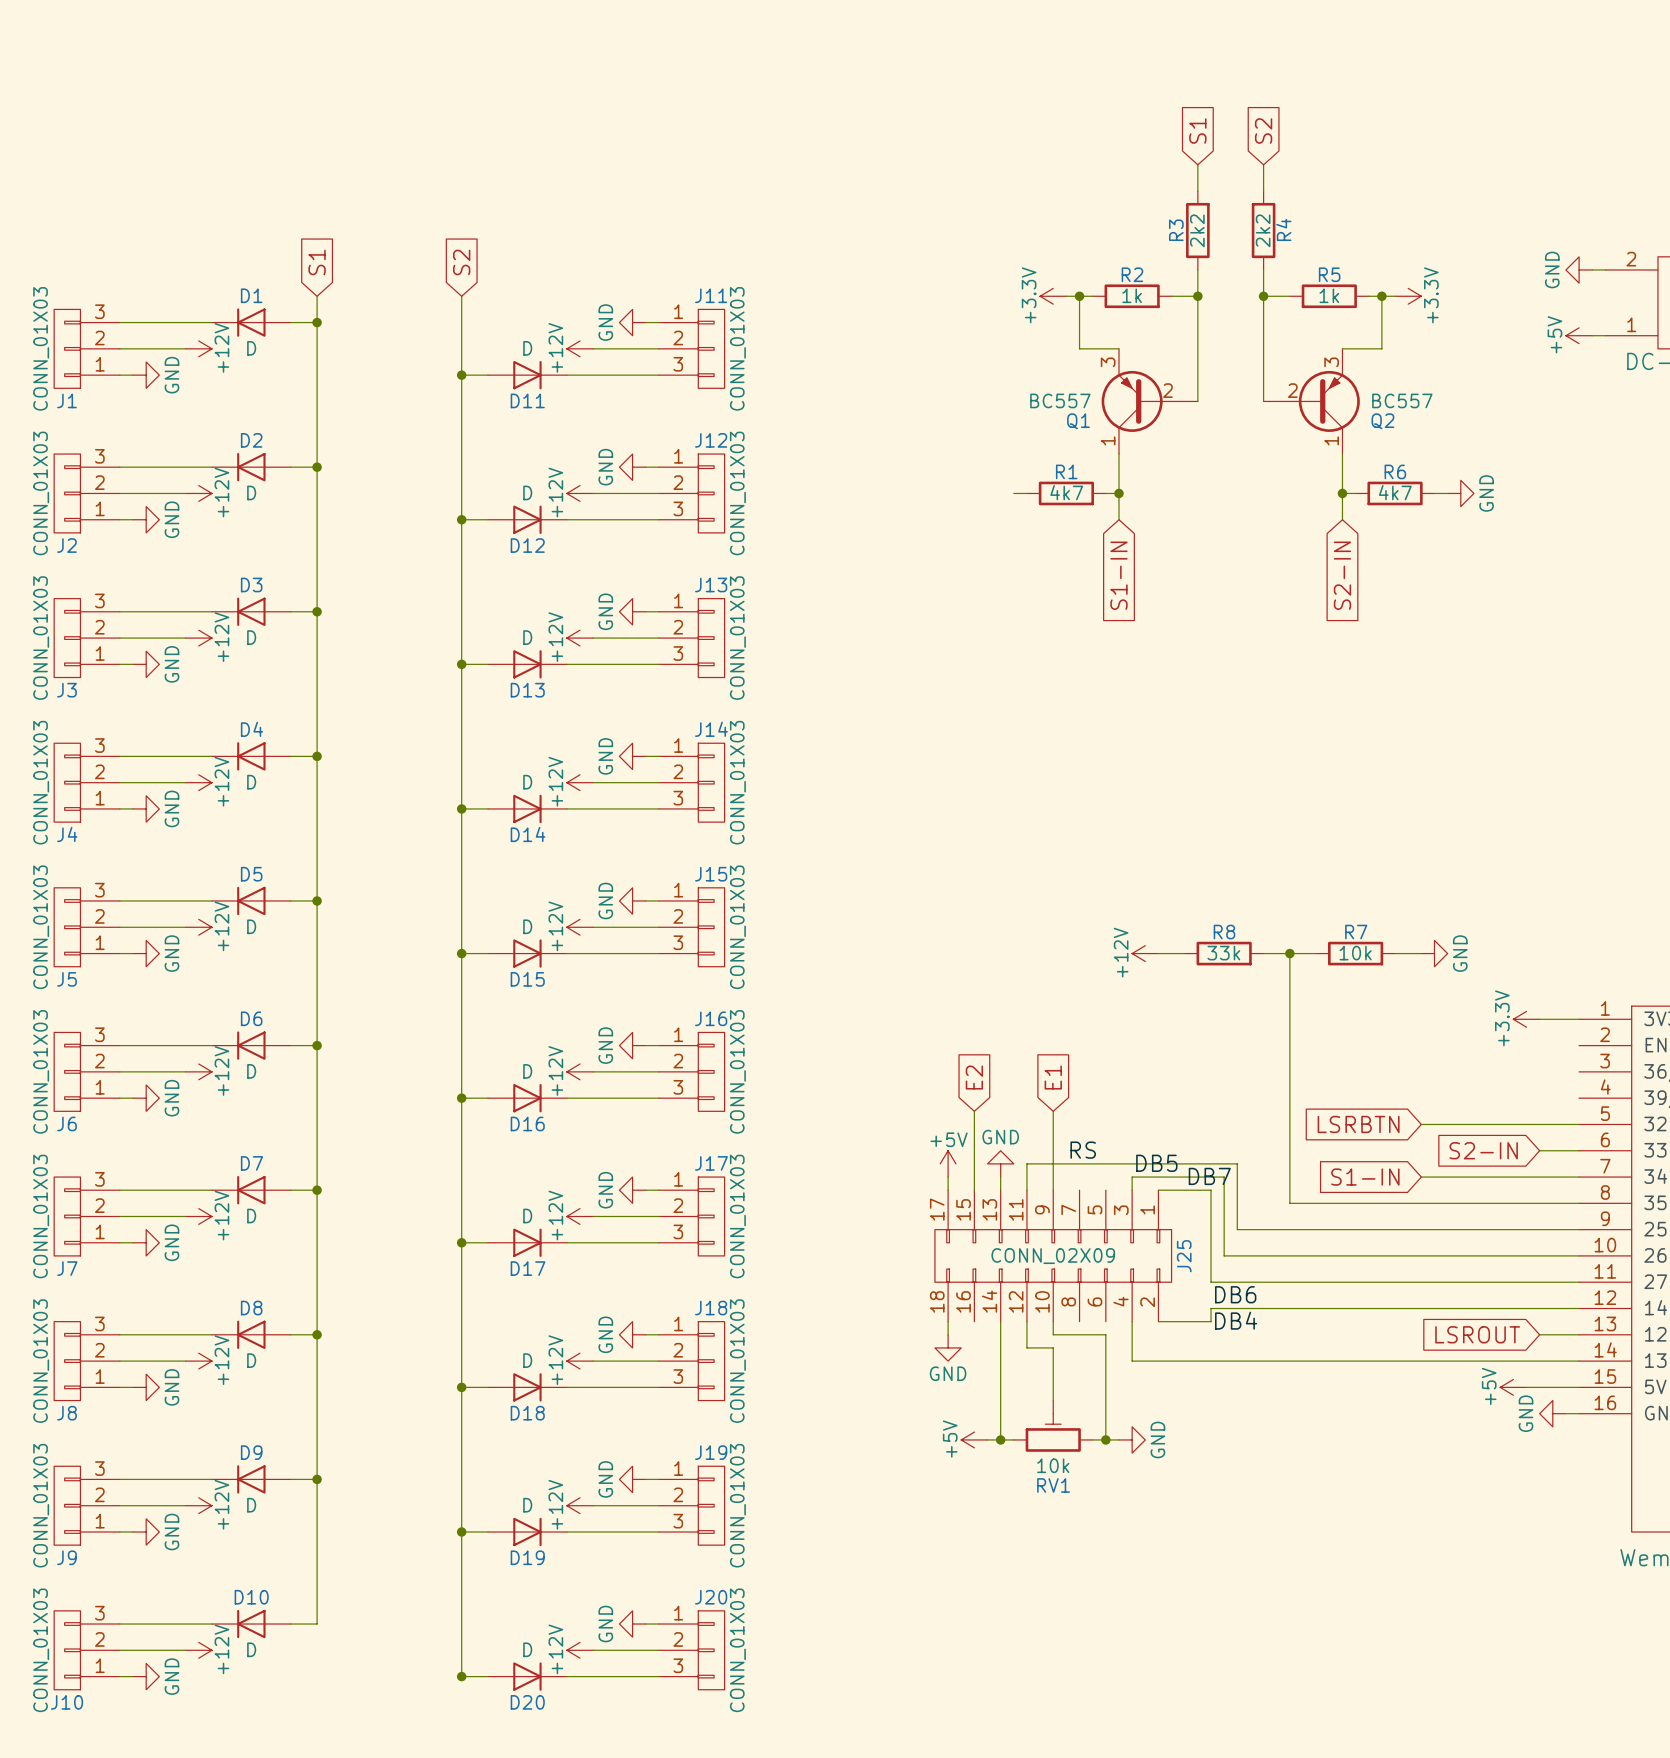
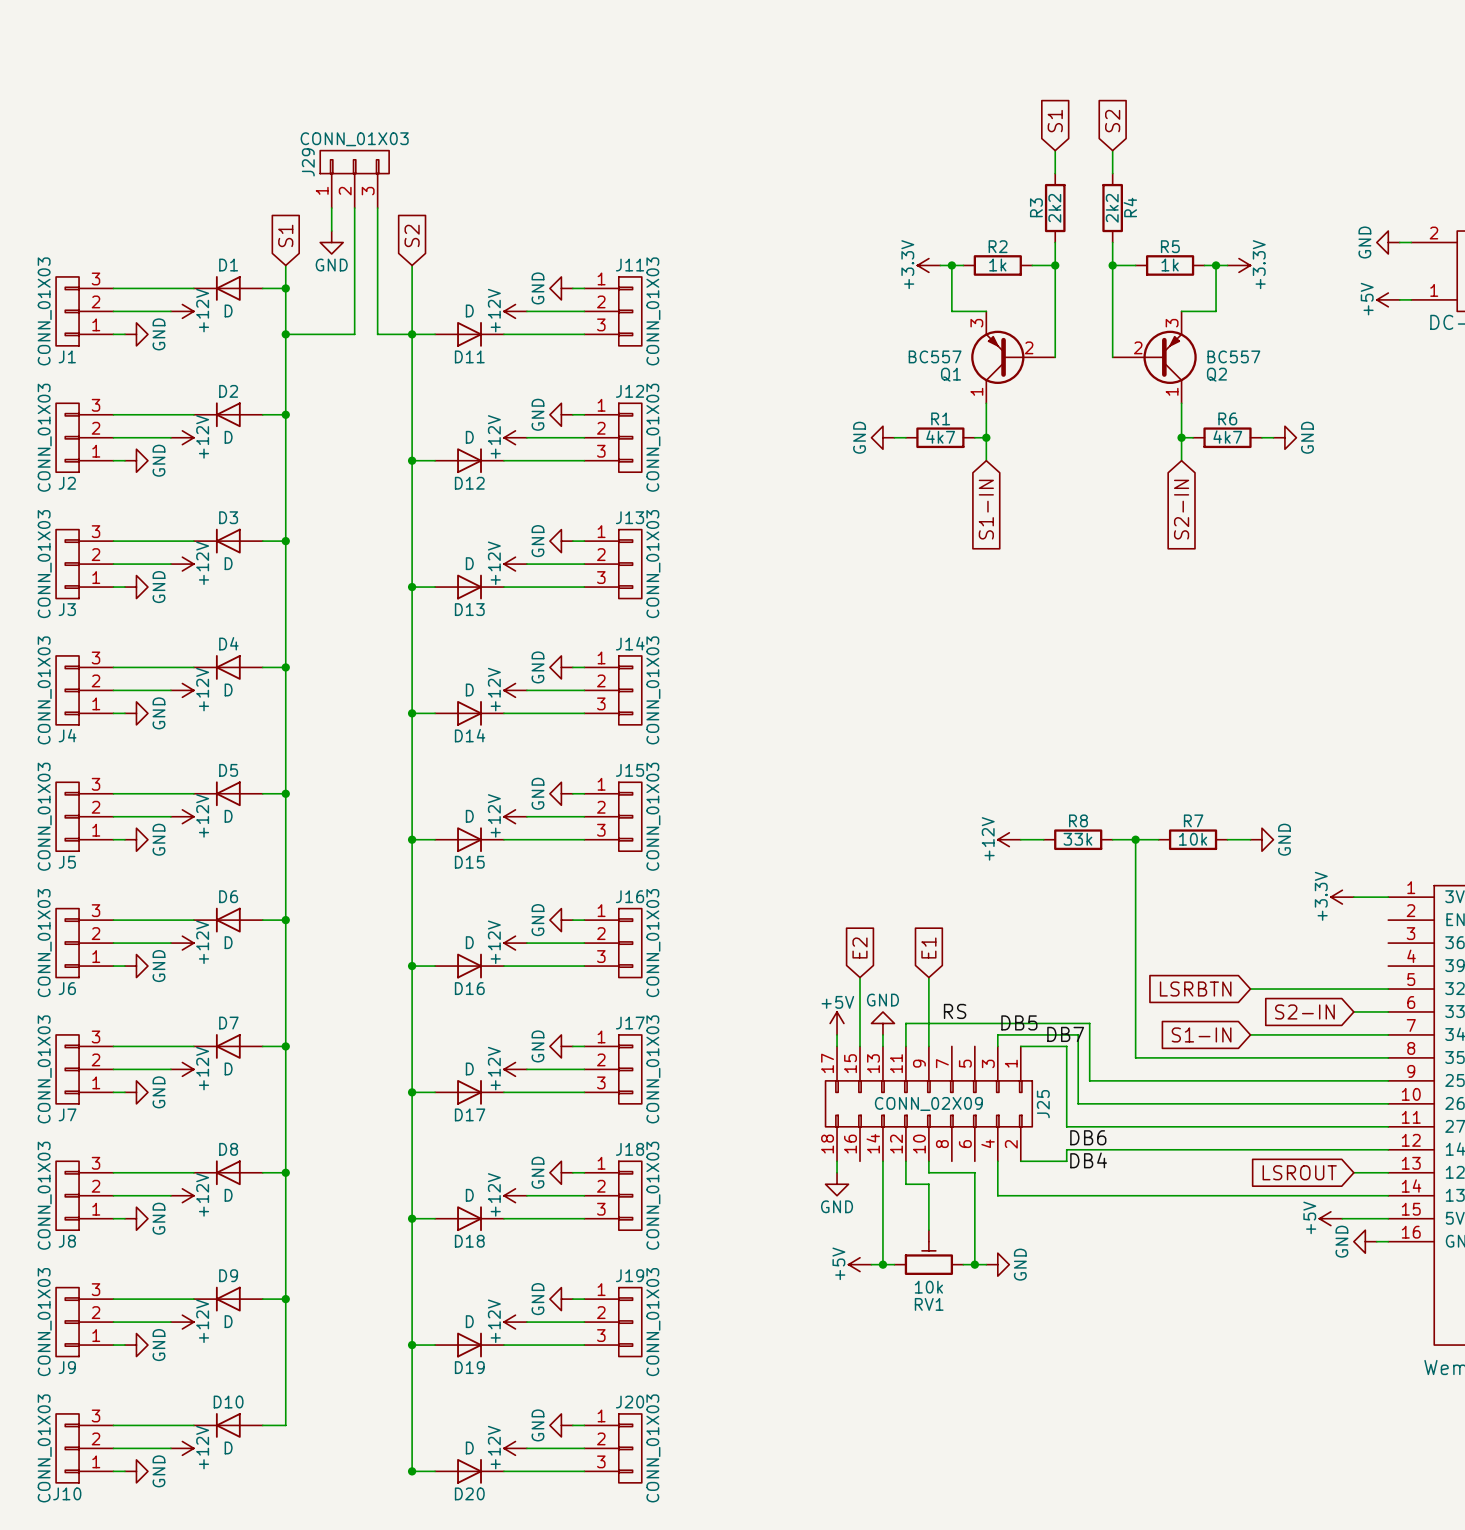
J29: none -> CONN_01X03 (354, 179)
wire: none -> (331, 208) (331, 231)
wire: none -> (354, 208) (354, 334) (285, 334)
wire: none -> (377, 208) (377, 334) (412, 334)
power symbol: none -> GND (331, 242)
junction: none -> (285, 334)
power symbol: none -> GND (882, 437)

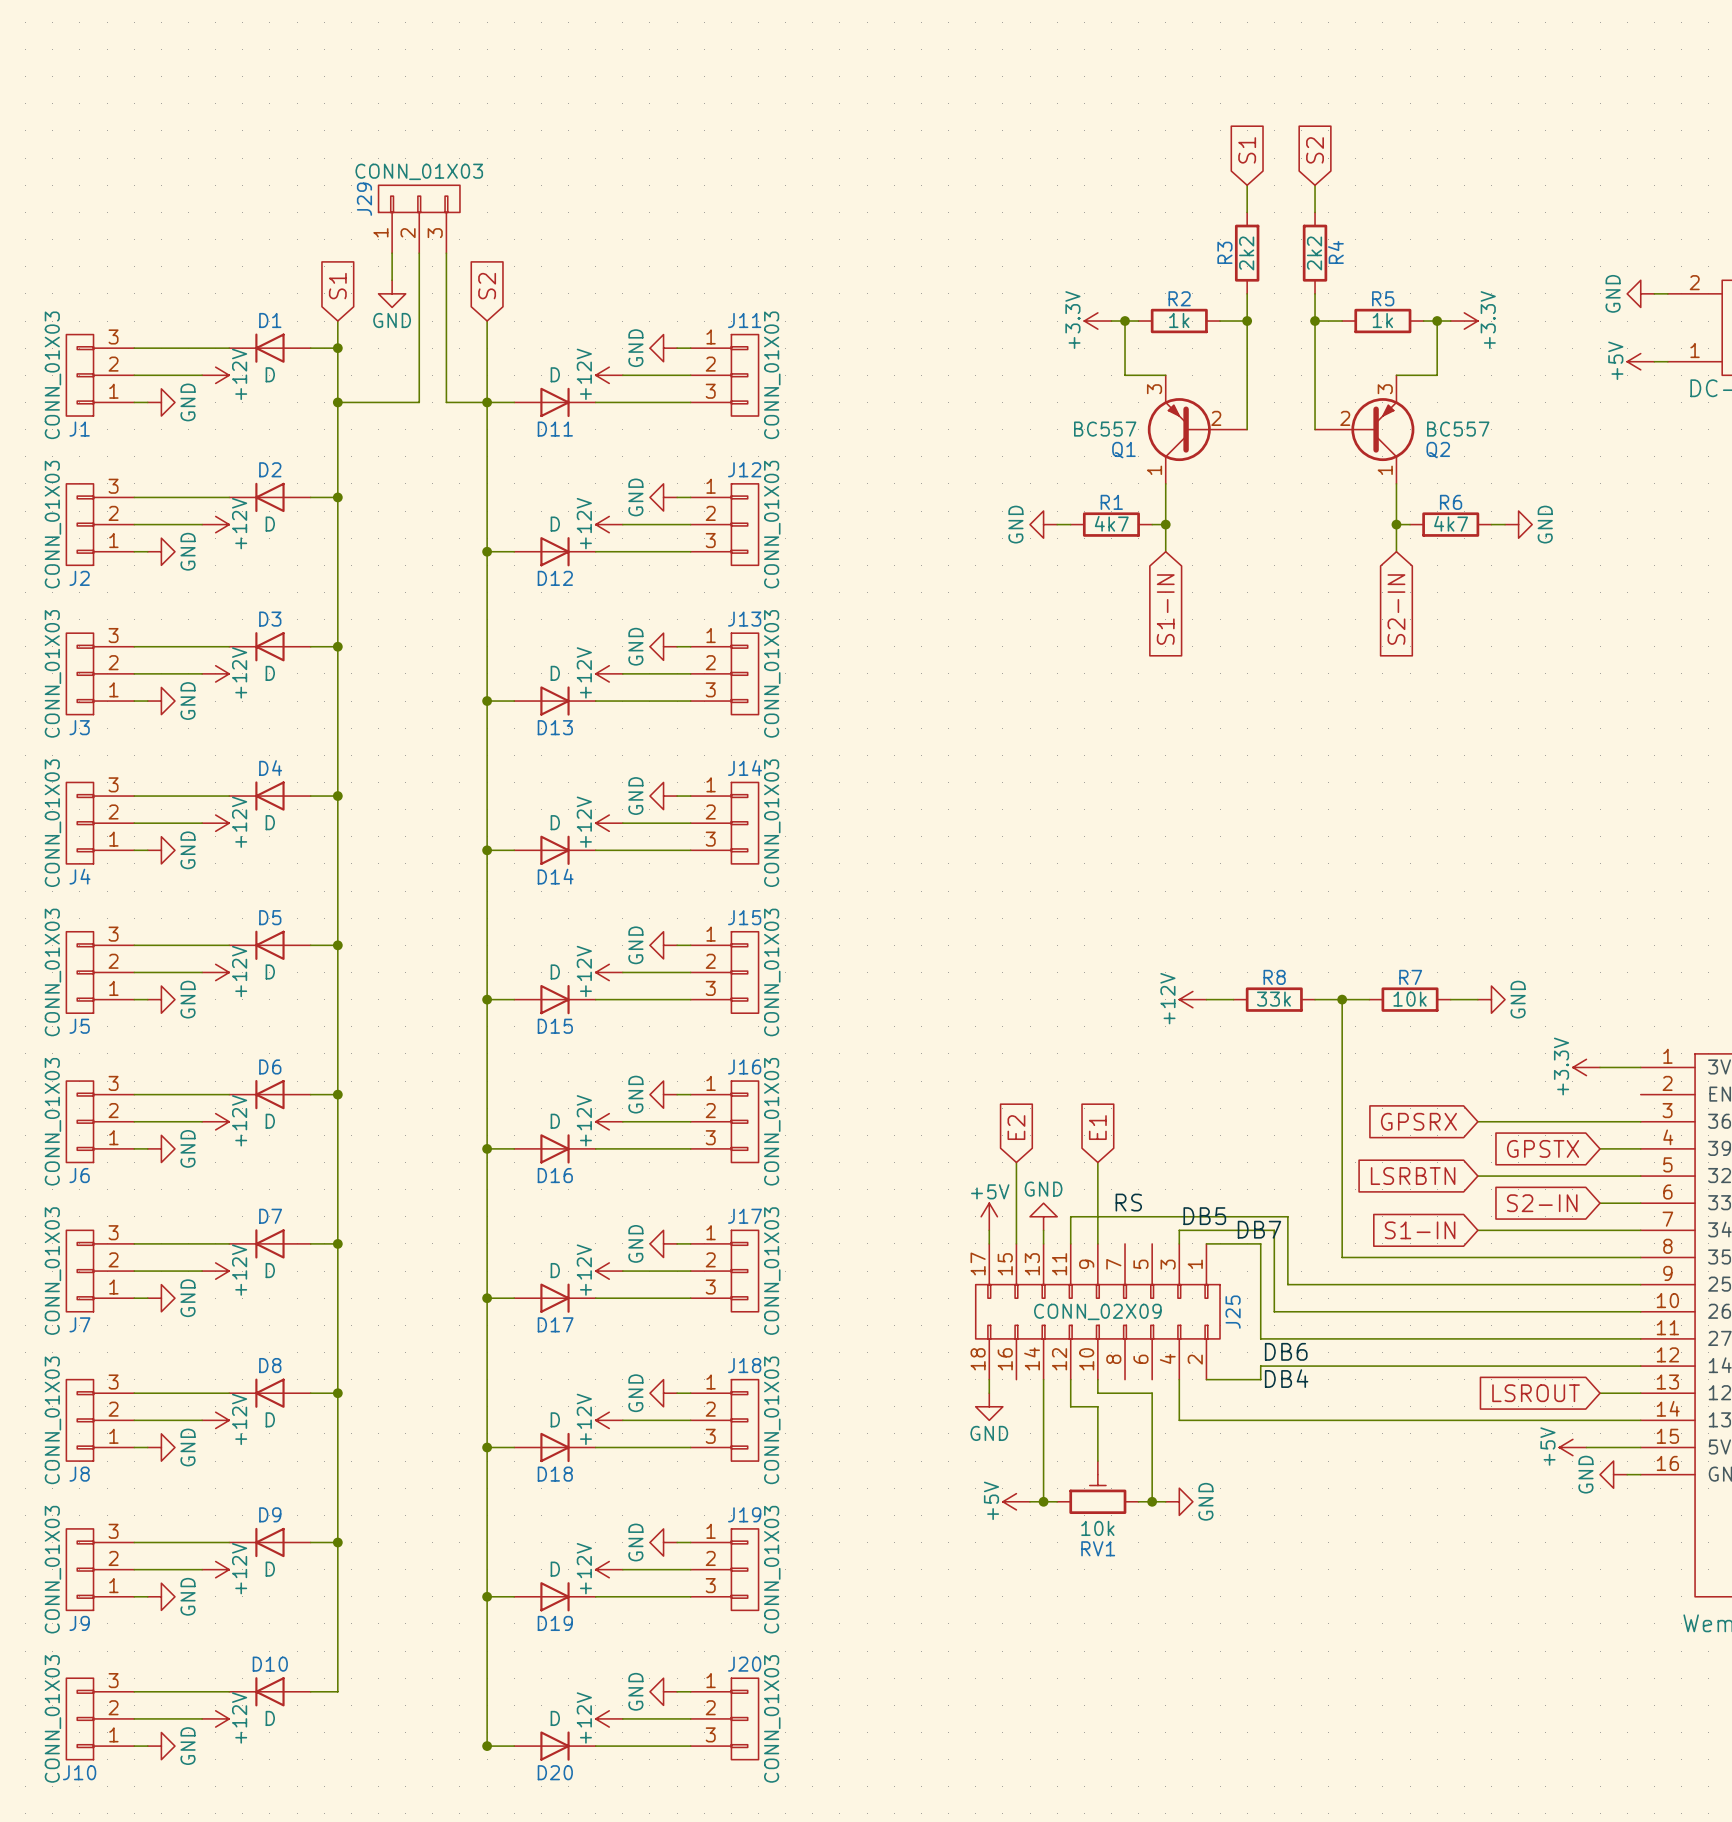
global label: none -> GPSRX (1418, 1121)
wire: none -> (1477, 1121) (1640, 1121)
global label: none -> GPSTX (1543, 1148)
wire: none -> (1600, 1148) (1640, 1148)

